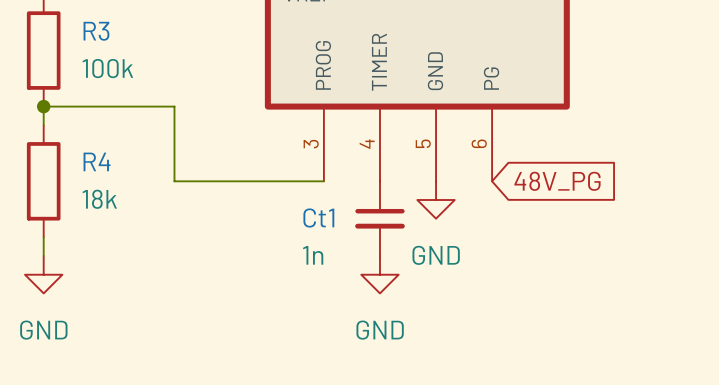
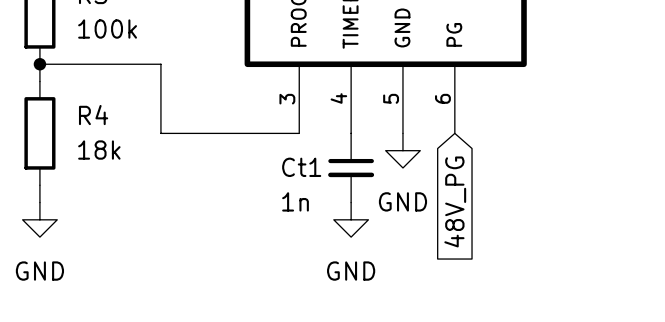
global label rotation: 0° (557, 181) -> 90° clockwise (455, 201)

